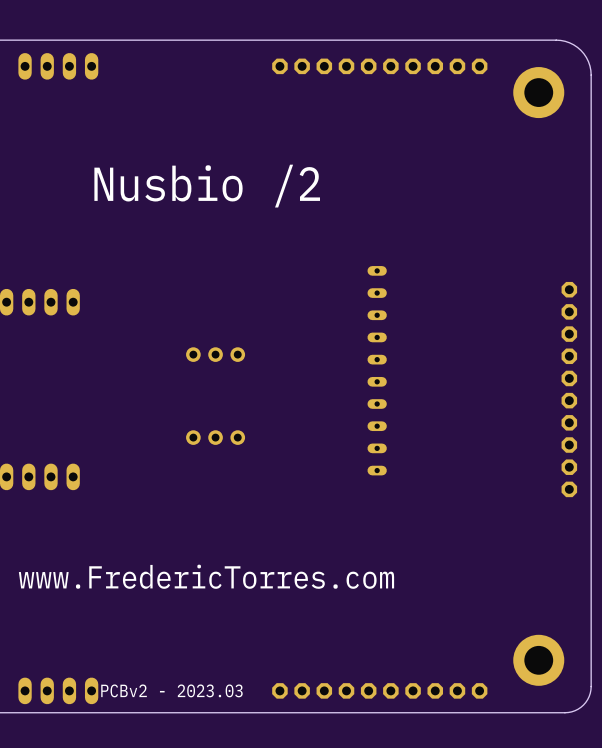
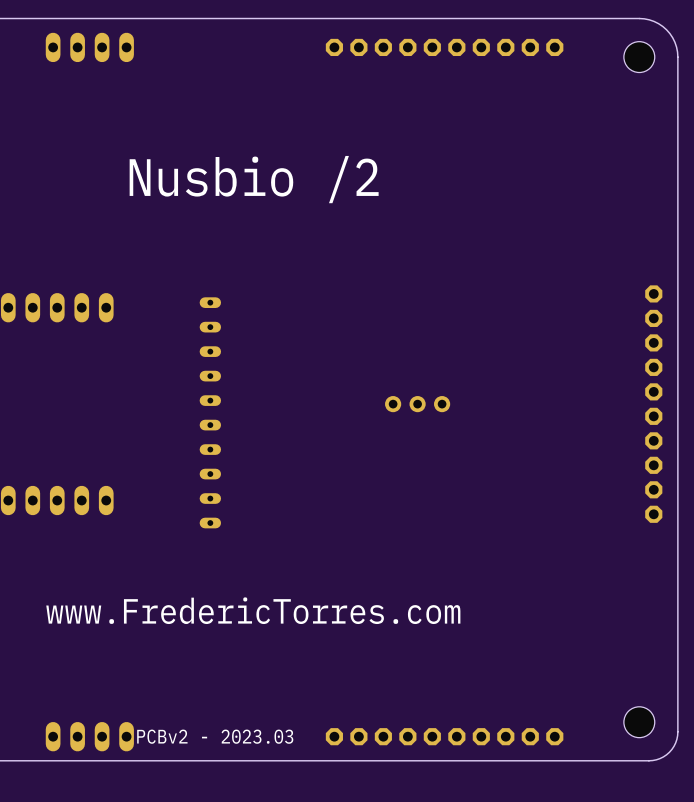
hole: none -> (639, 57)
part: (538, 92) -> none
part: (215, 354) -> none
part position: (377, 370) -> (210, 412)
part: none -> (417, 404)
part: (215, 437) -> none
part: (538, 660) -> none
hole: none -> (639, 722)

